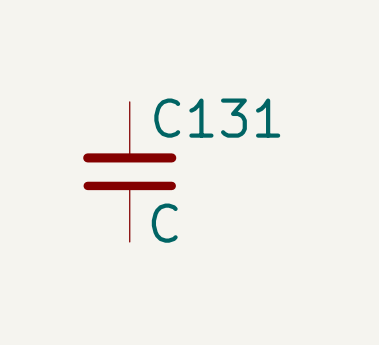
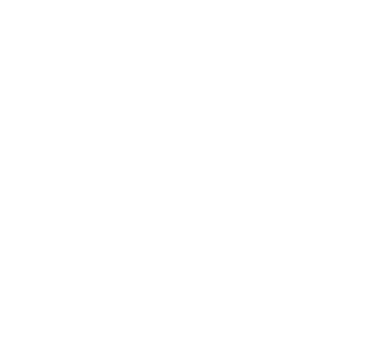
C131: C (129, 171) -> none

